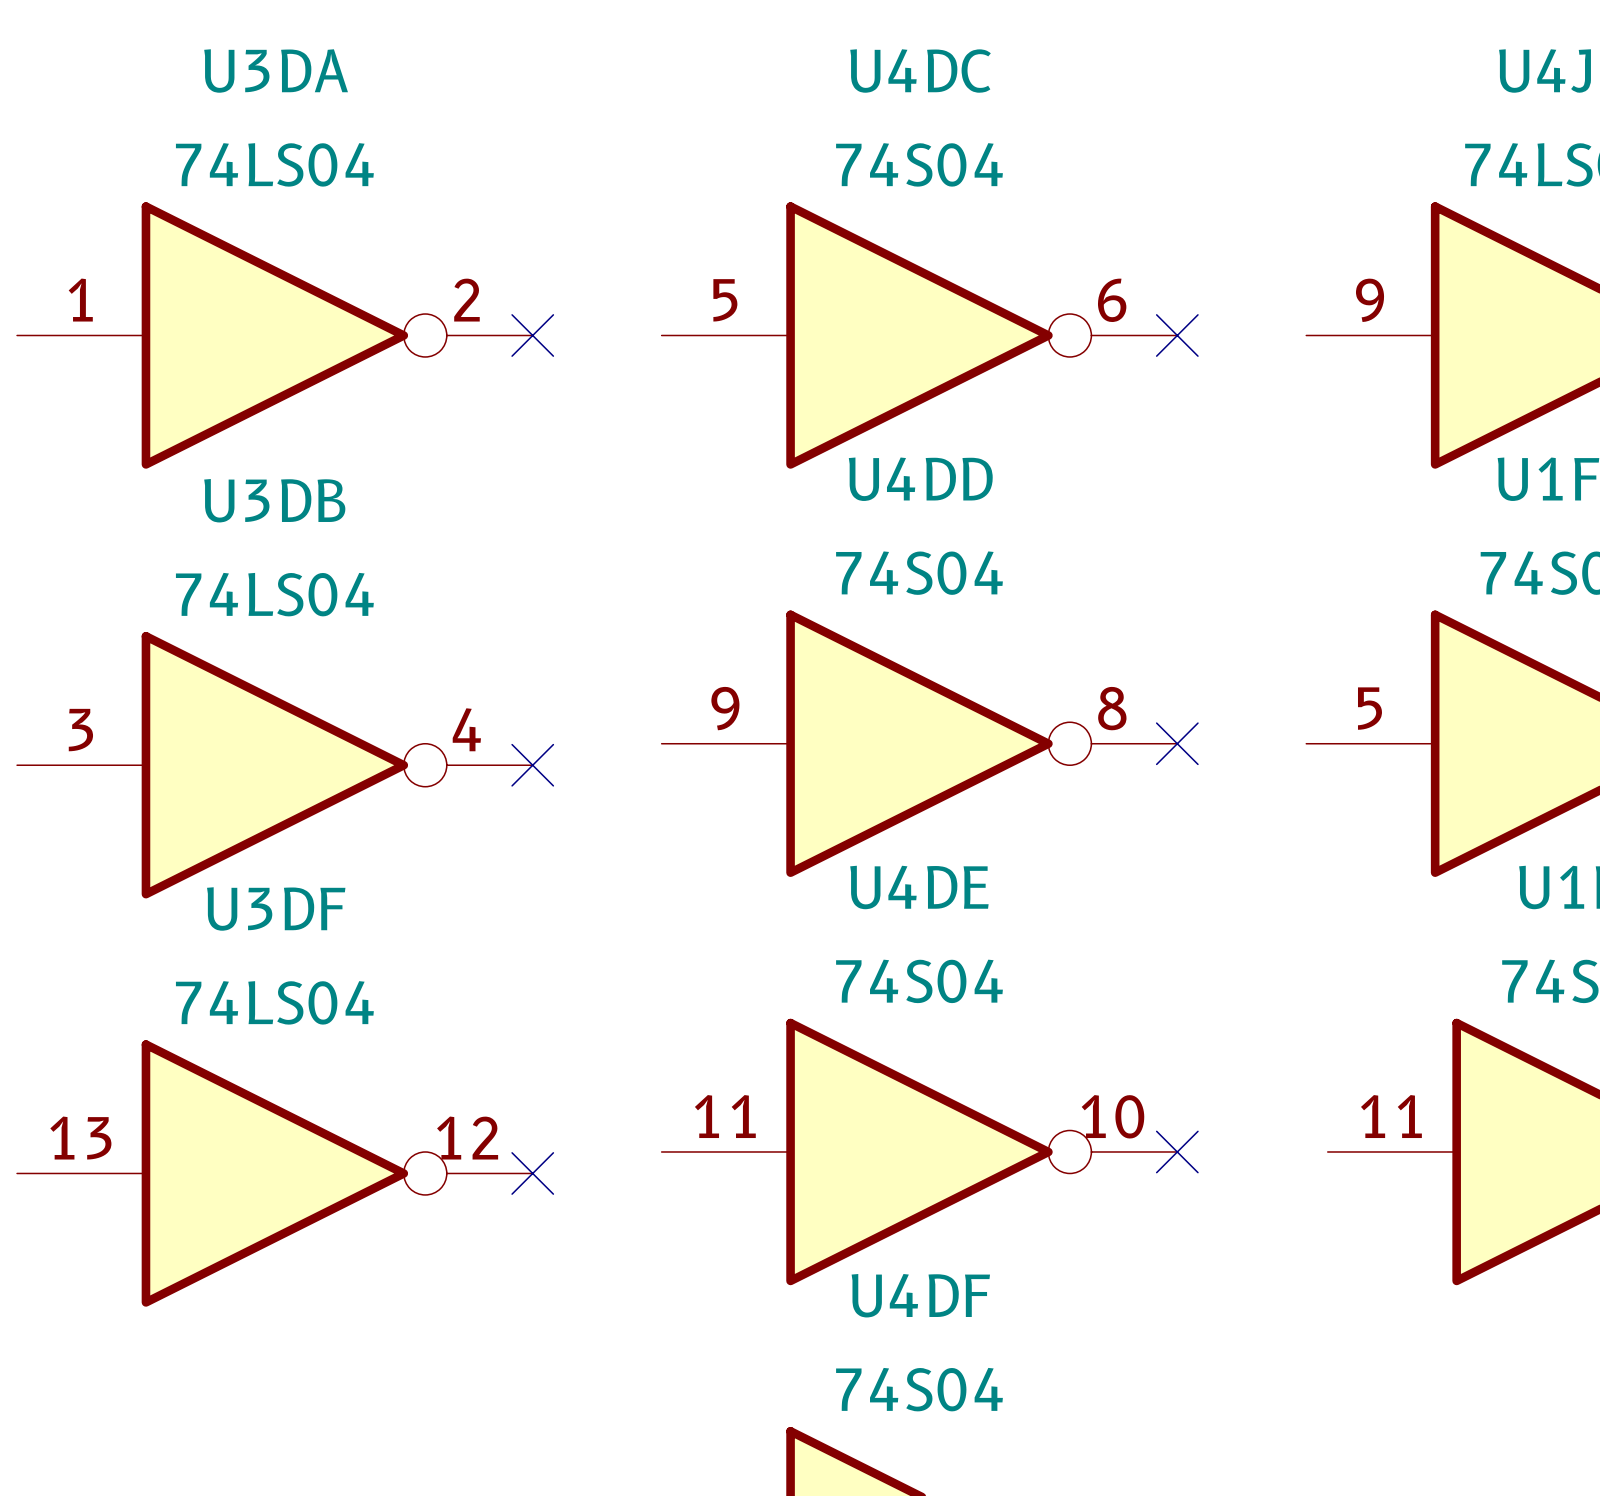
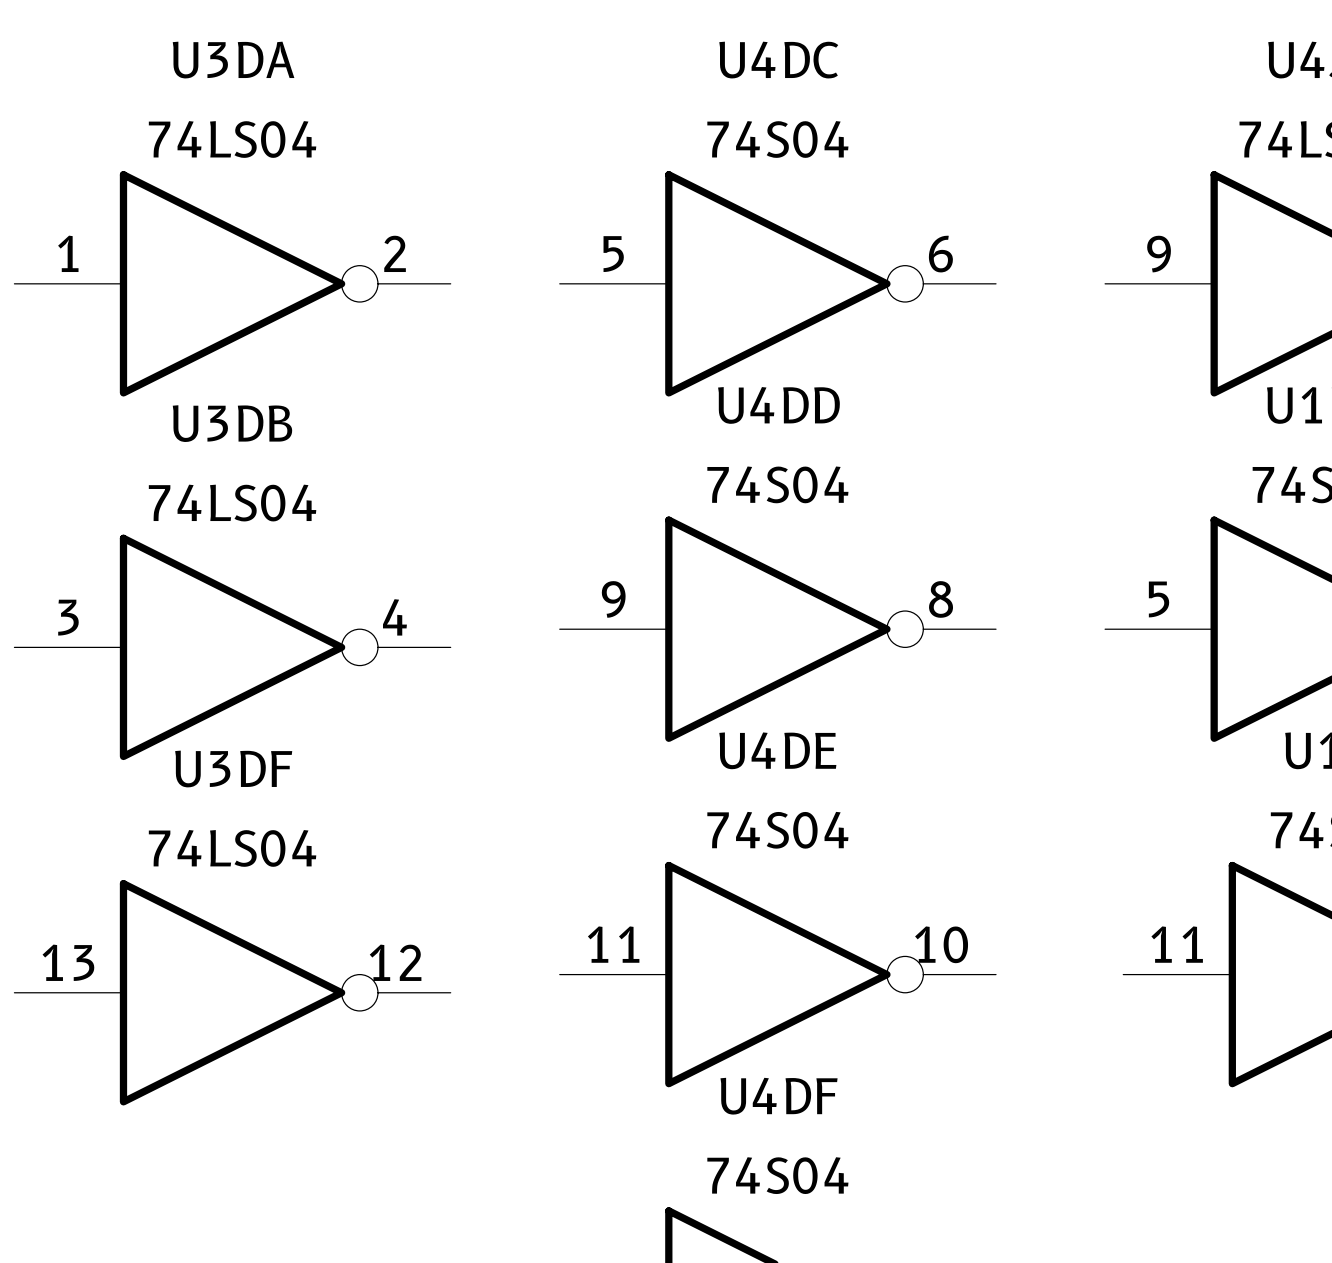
no-connect mark: (532, 335) -> none
no-connect mark: (1177, 335) -> none
no-connect mark: (1177, 743) -> none
no-connect mark: (532, 765) -> none
no-connect mark: (1177, 1151) -> none
no-connect mark: (532, 1173) -> none

